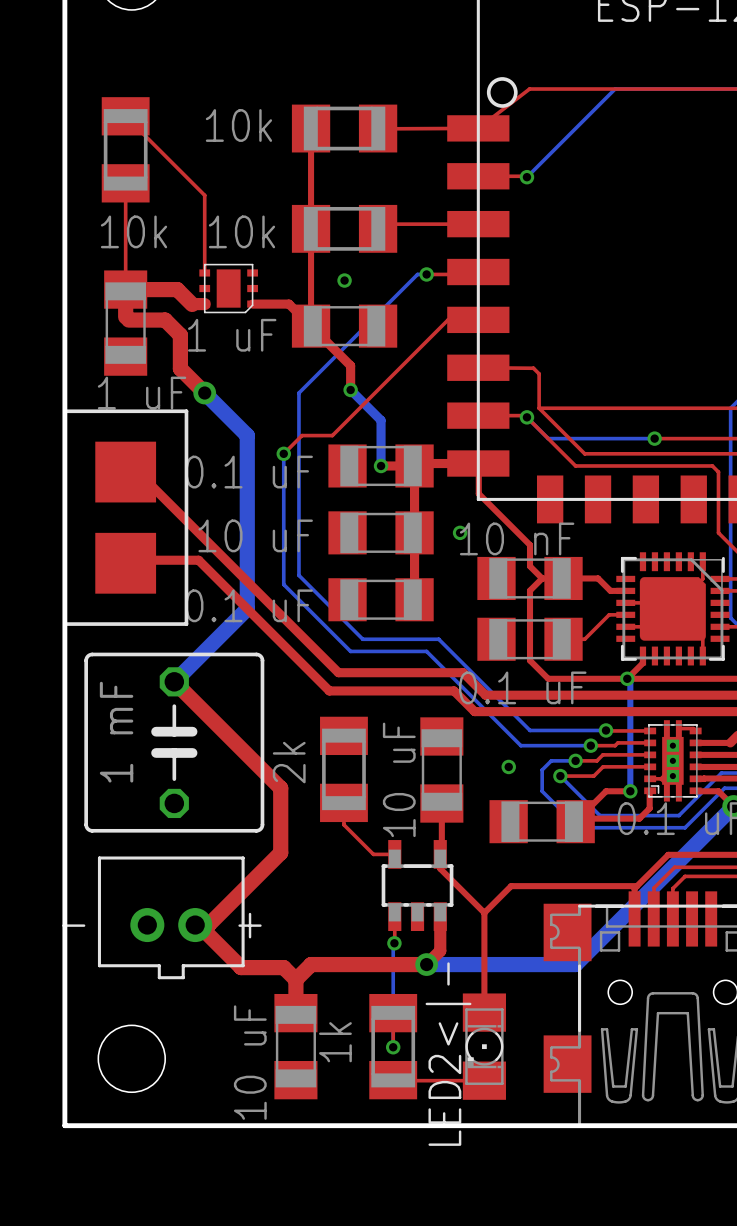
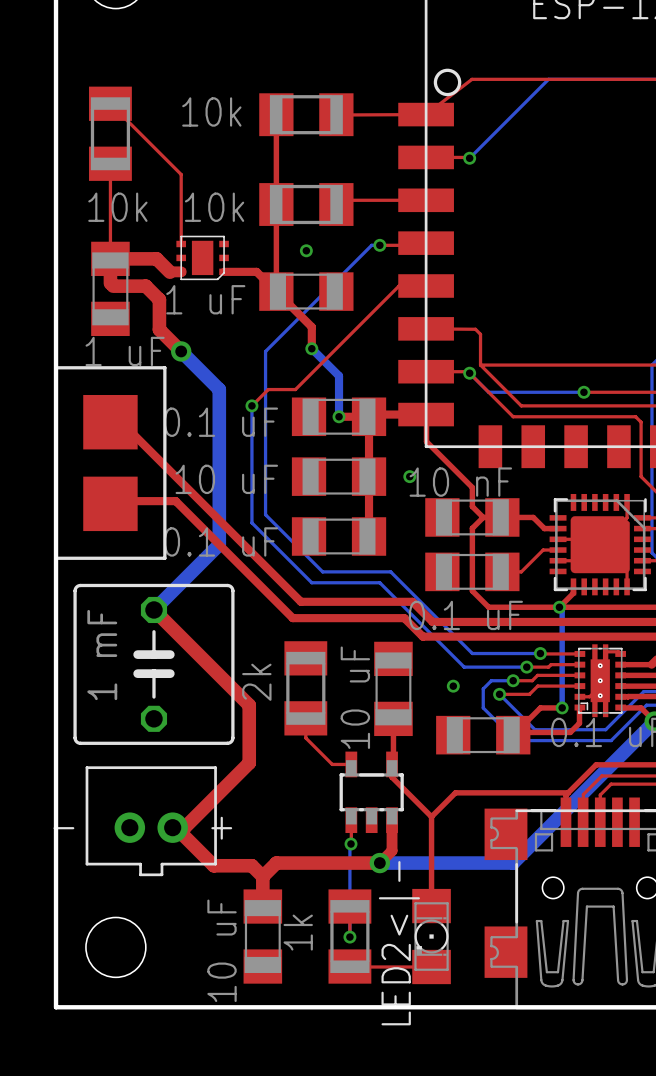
part footprint: [644, 720, 702, 802] -> [574, 644, 626, 718]

